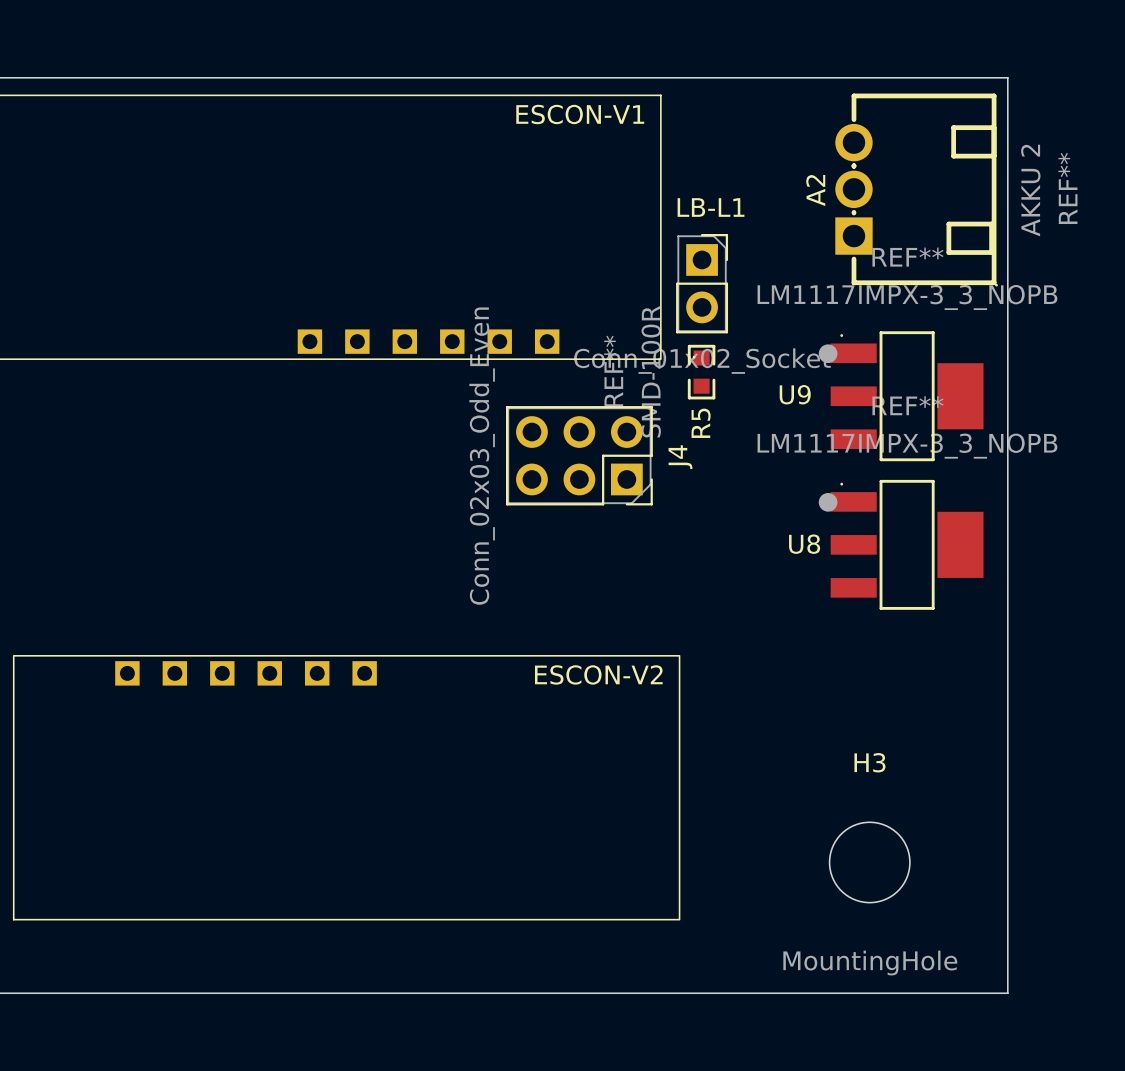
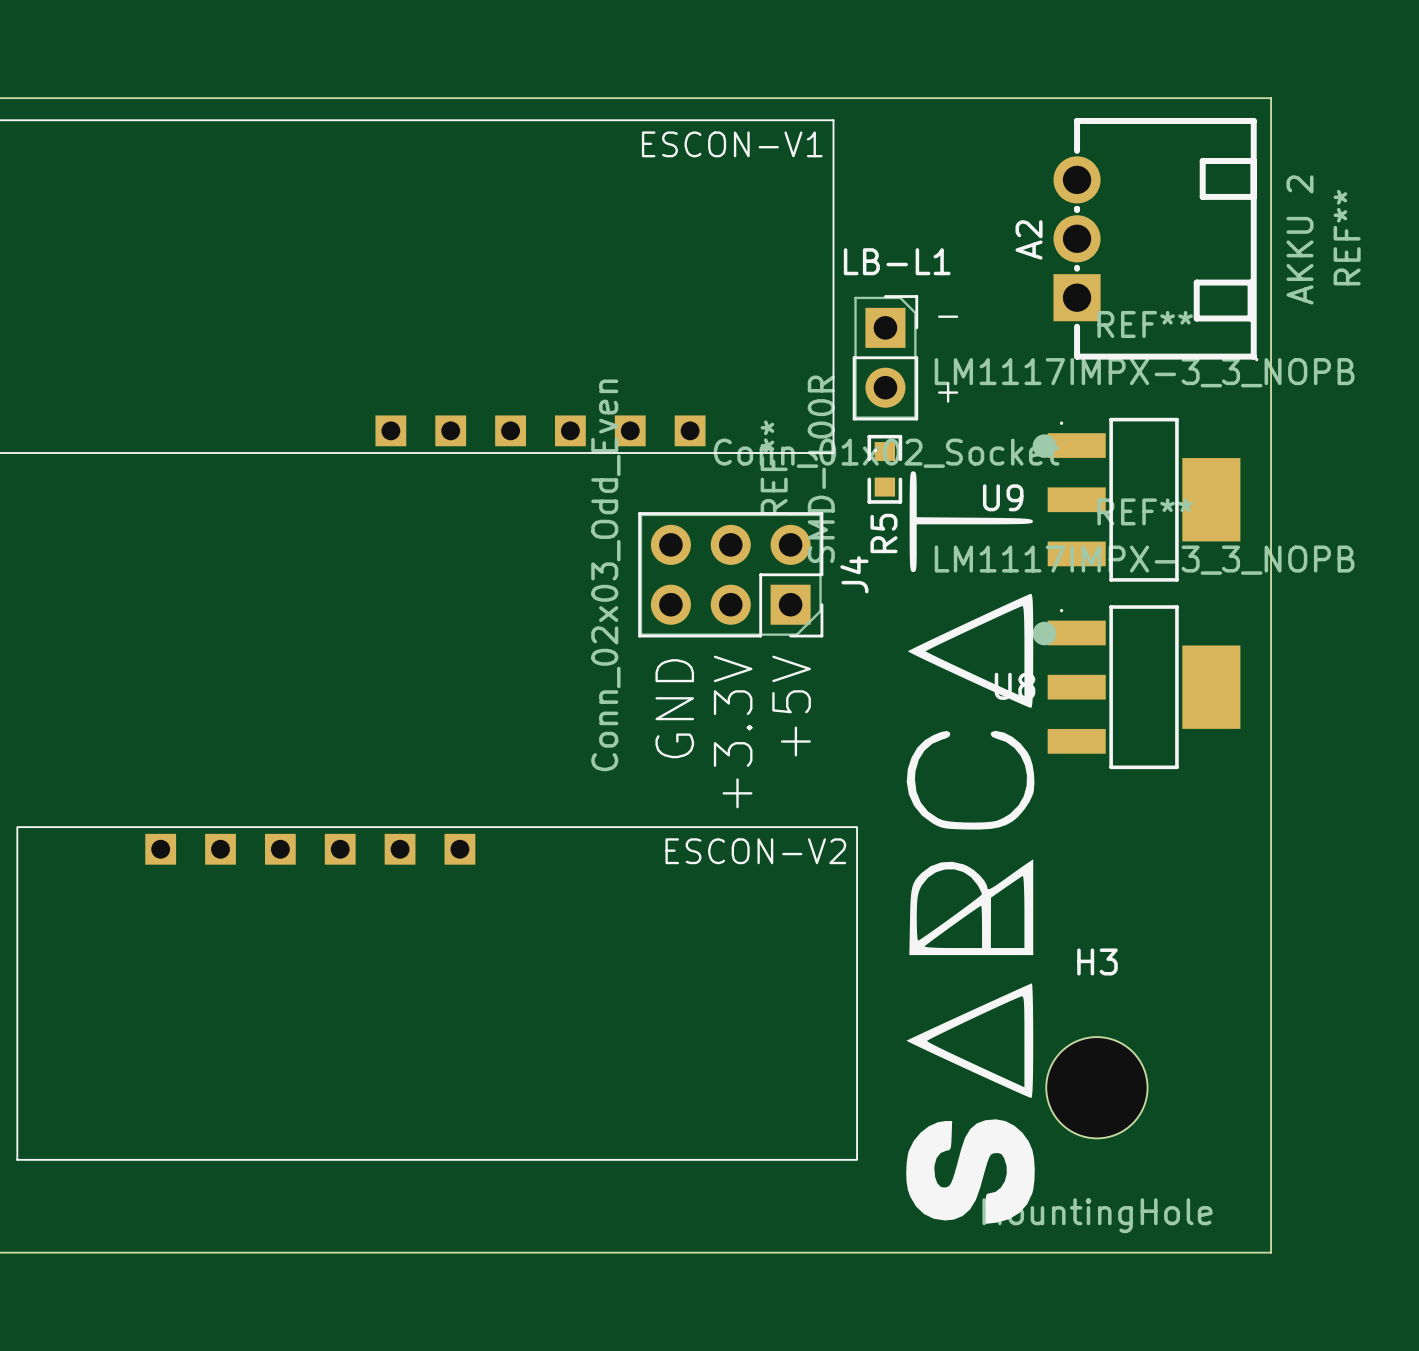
text: none -> - (948, 316)
text: none -> + (948, 392)
drawing: none -> [906, 471, 1035, 1224]
text: none -> +5V (791, 706)
text: none -> GND (674, 708)
text: none -> +3.3V (733, 732)

